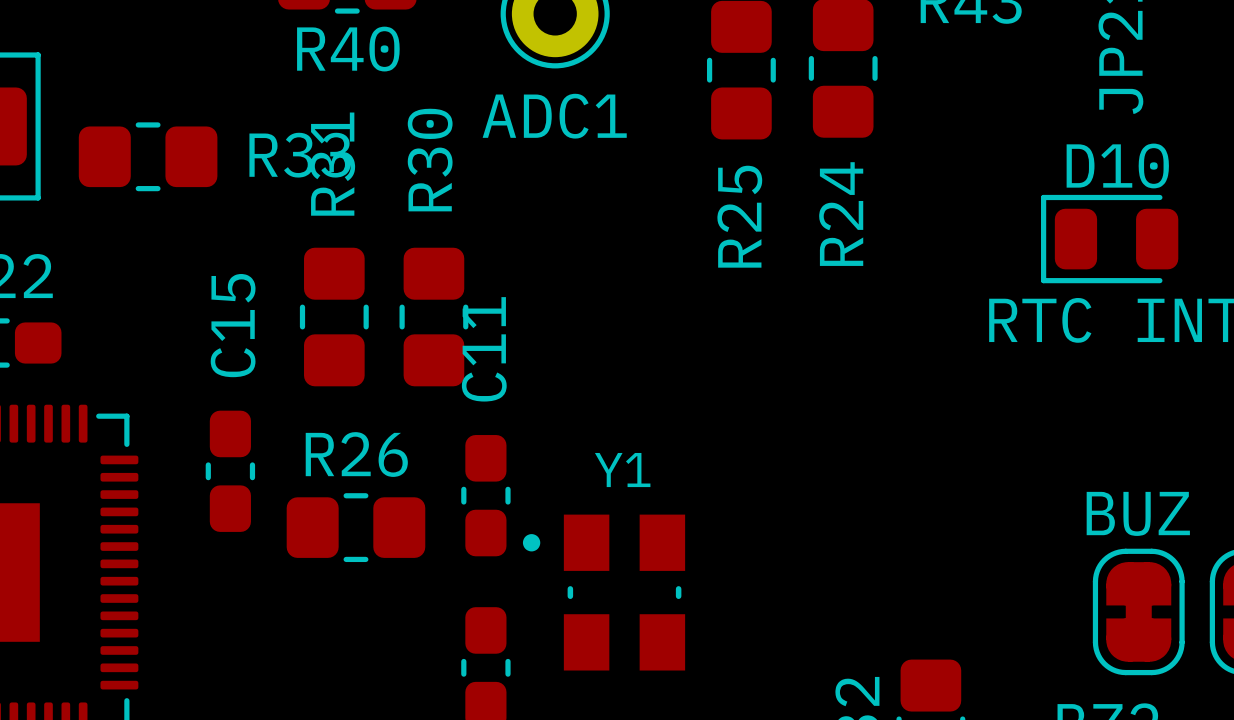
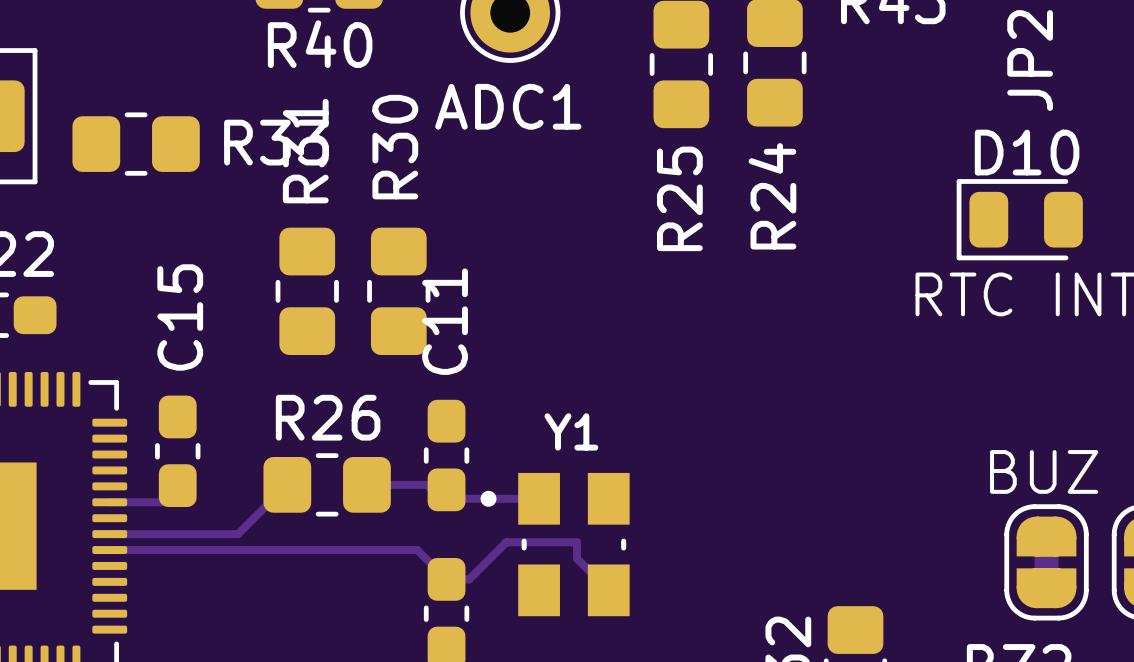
C15 position: (230, 471) -> (177, 451)
track: none -> (287, 484) (238, 534) (109, 534)
track: none -> (366, 484) (427, 484) (432, 489) (446, 489) (455, 498) (539, 498)
track: none -> (177, 485) (161, 502) (109, 502)
track: none -> (109, 550) (417, 550) (446, 579) (469, 579) (506, 542) (577, 542) (577, 558) (608, 590)

